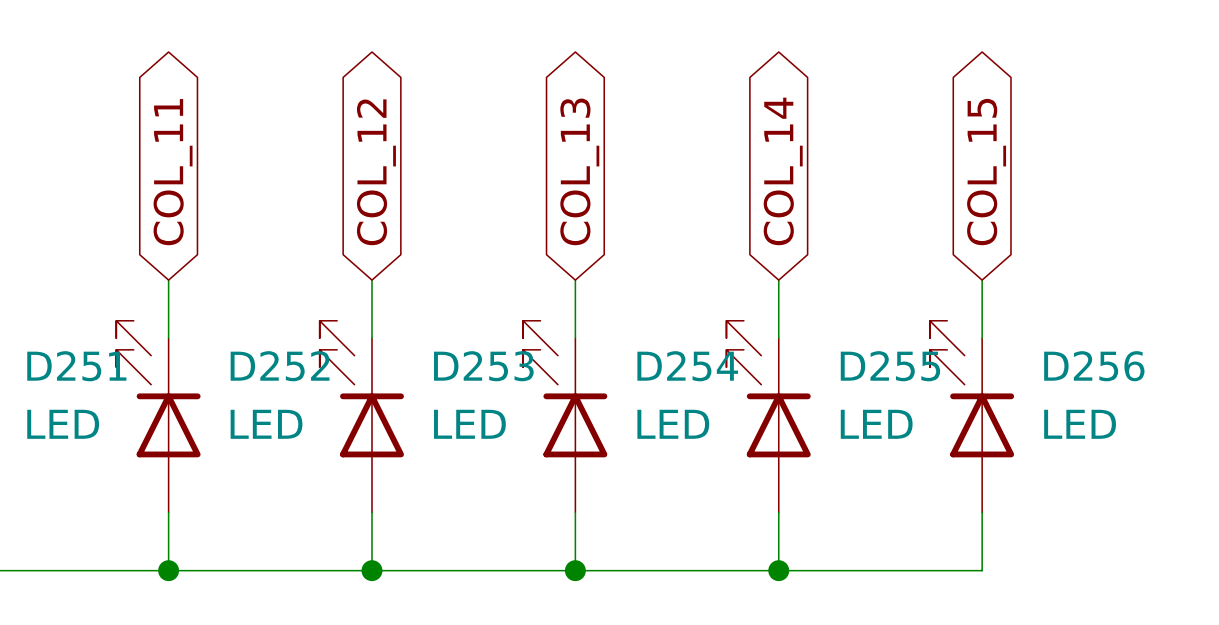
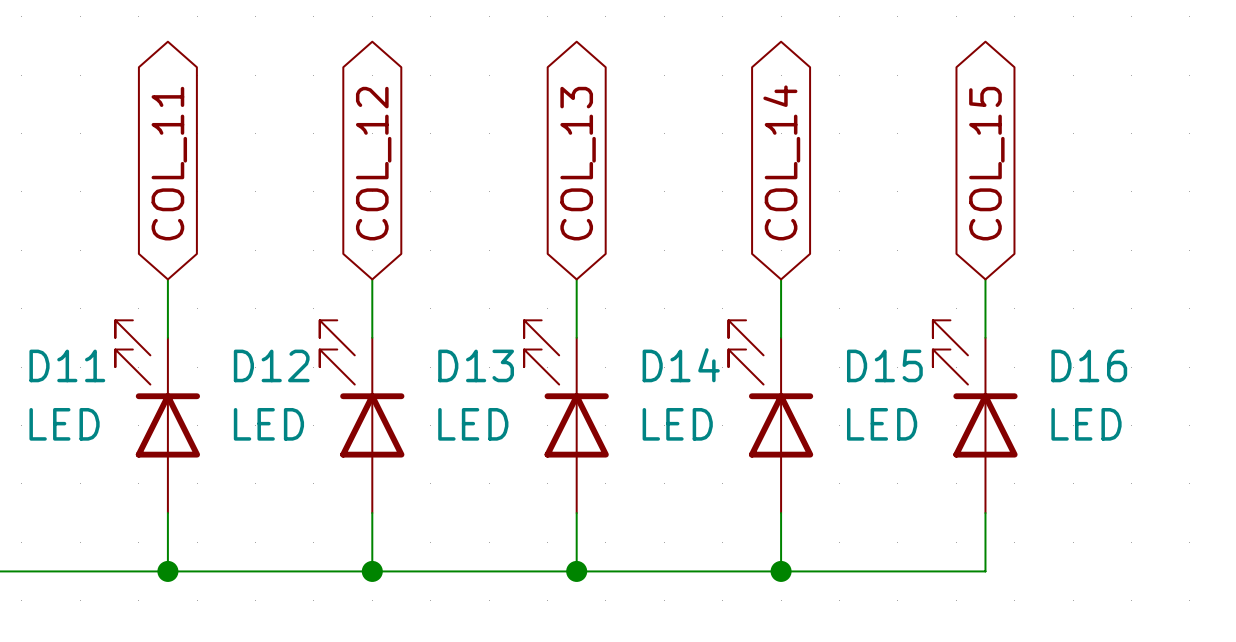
D251 name: D251 (76, 366) -> D11 (67, 365)
D252 name: D252 (280, 366) -> D12 (271, 365)
D253 name: D253 (483, 366) -> D13 (476, 365)
D254 name: D254 (687, 366) -> D14 (681, 365)
D255 name: D255 (890, 366) -> D15 (884, 365)
D256 name: D256 (1094, 366) -> D16 (1089, 365)

